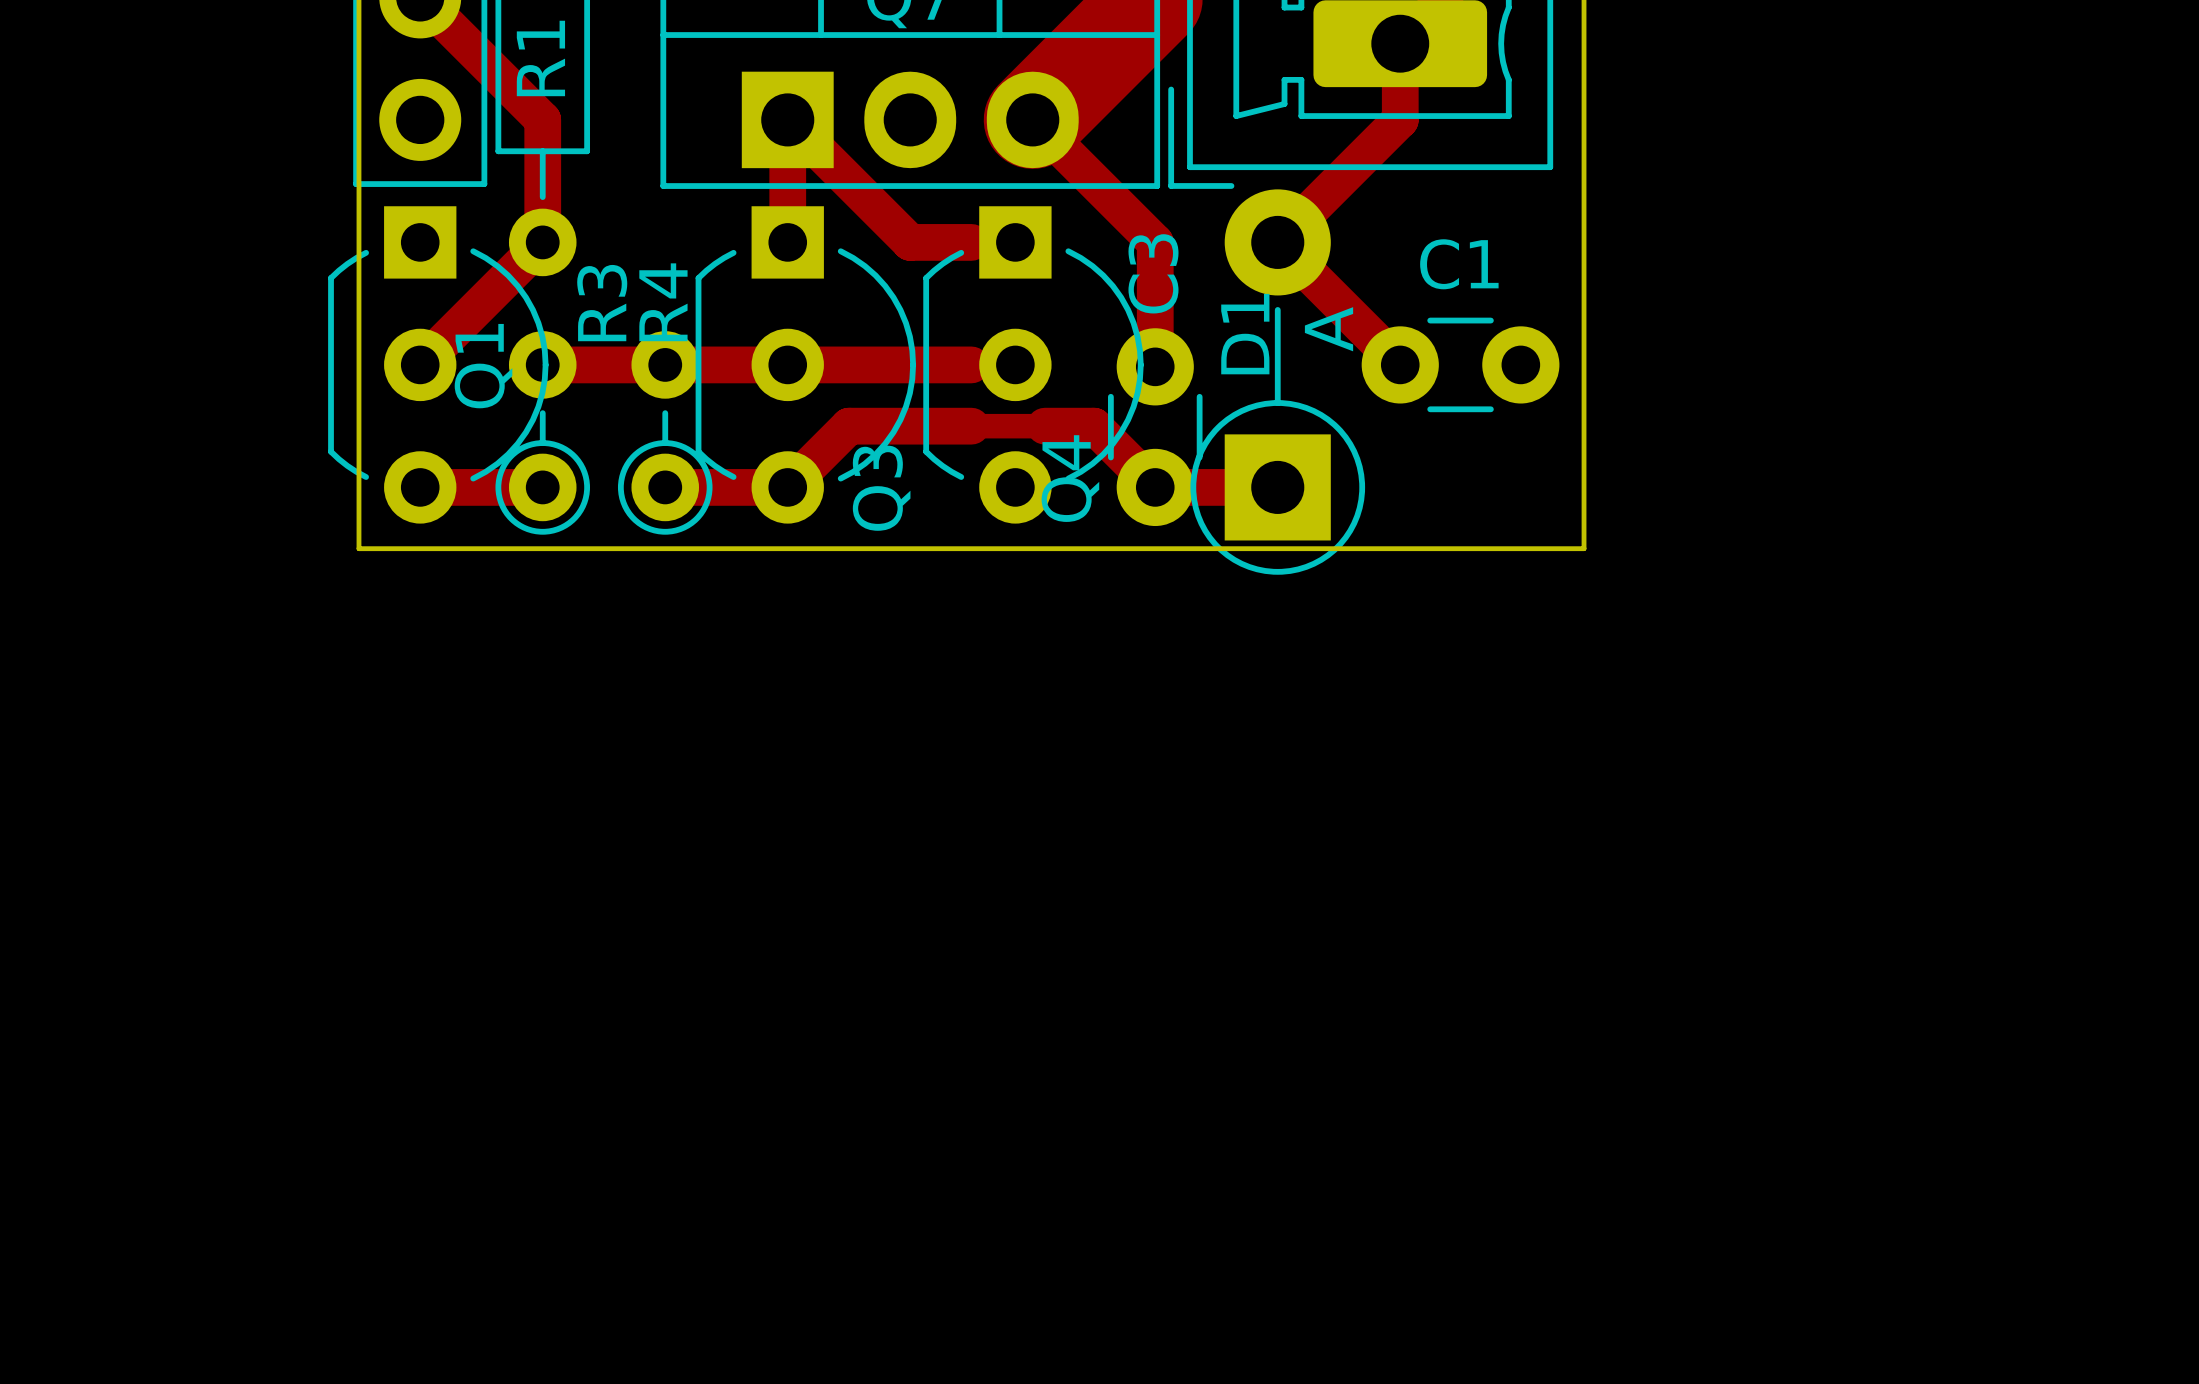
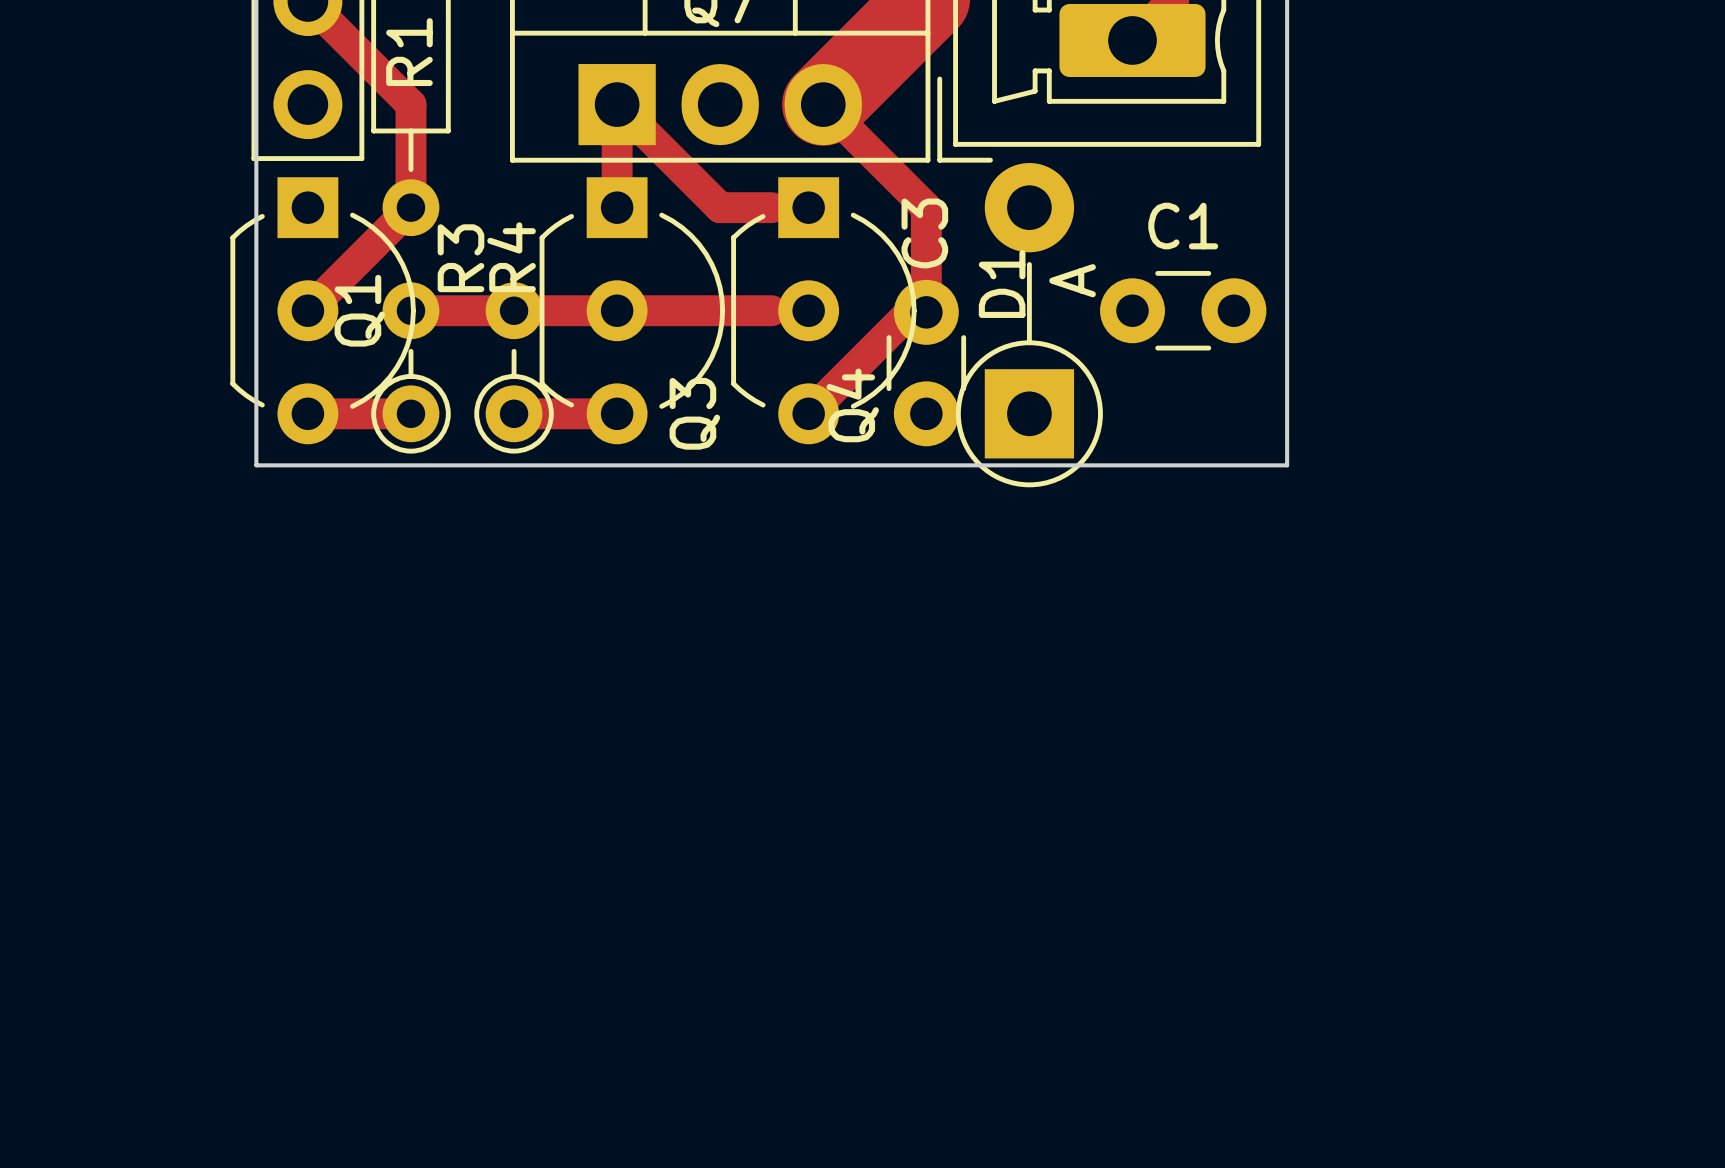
track: (1400, 43) (1400, 119) (1277, 242) (1400, 364) -> none
track: none -> (926, 312) (910, 312) (808, 413)
track: (787, 487) (849, 426) (1094, 426) (1155, 487) (1277, 487) -> none

